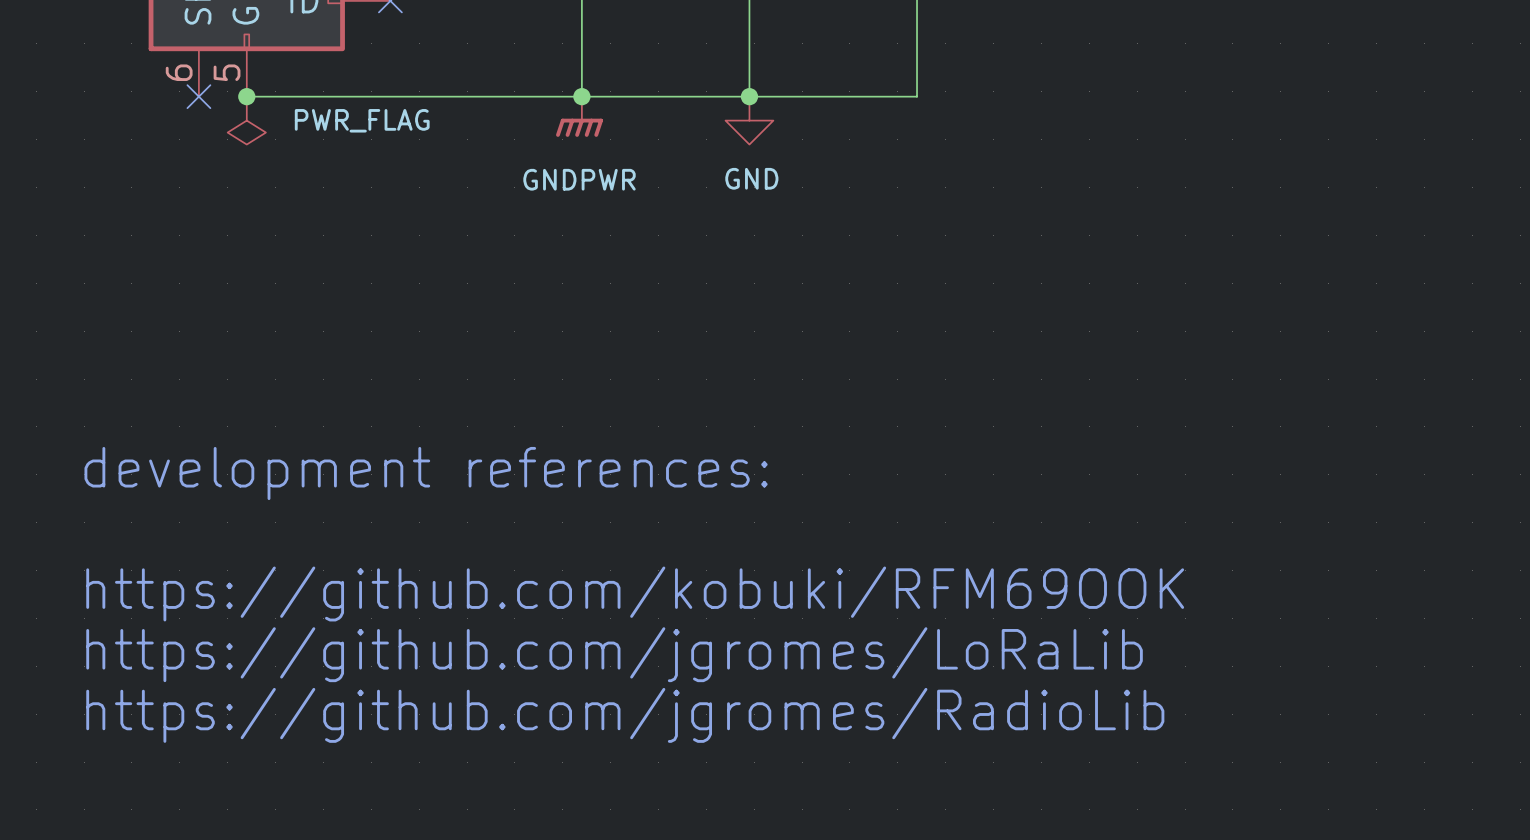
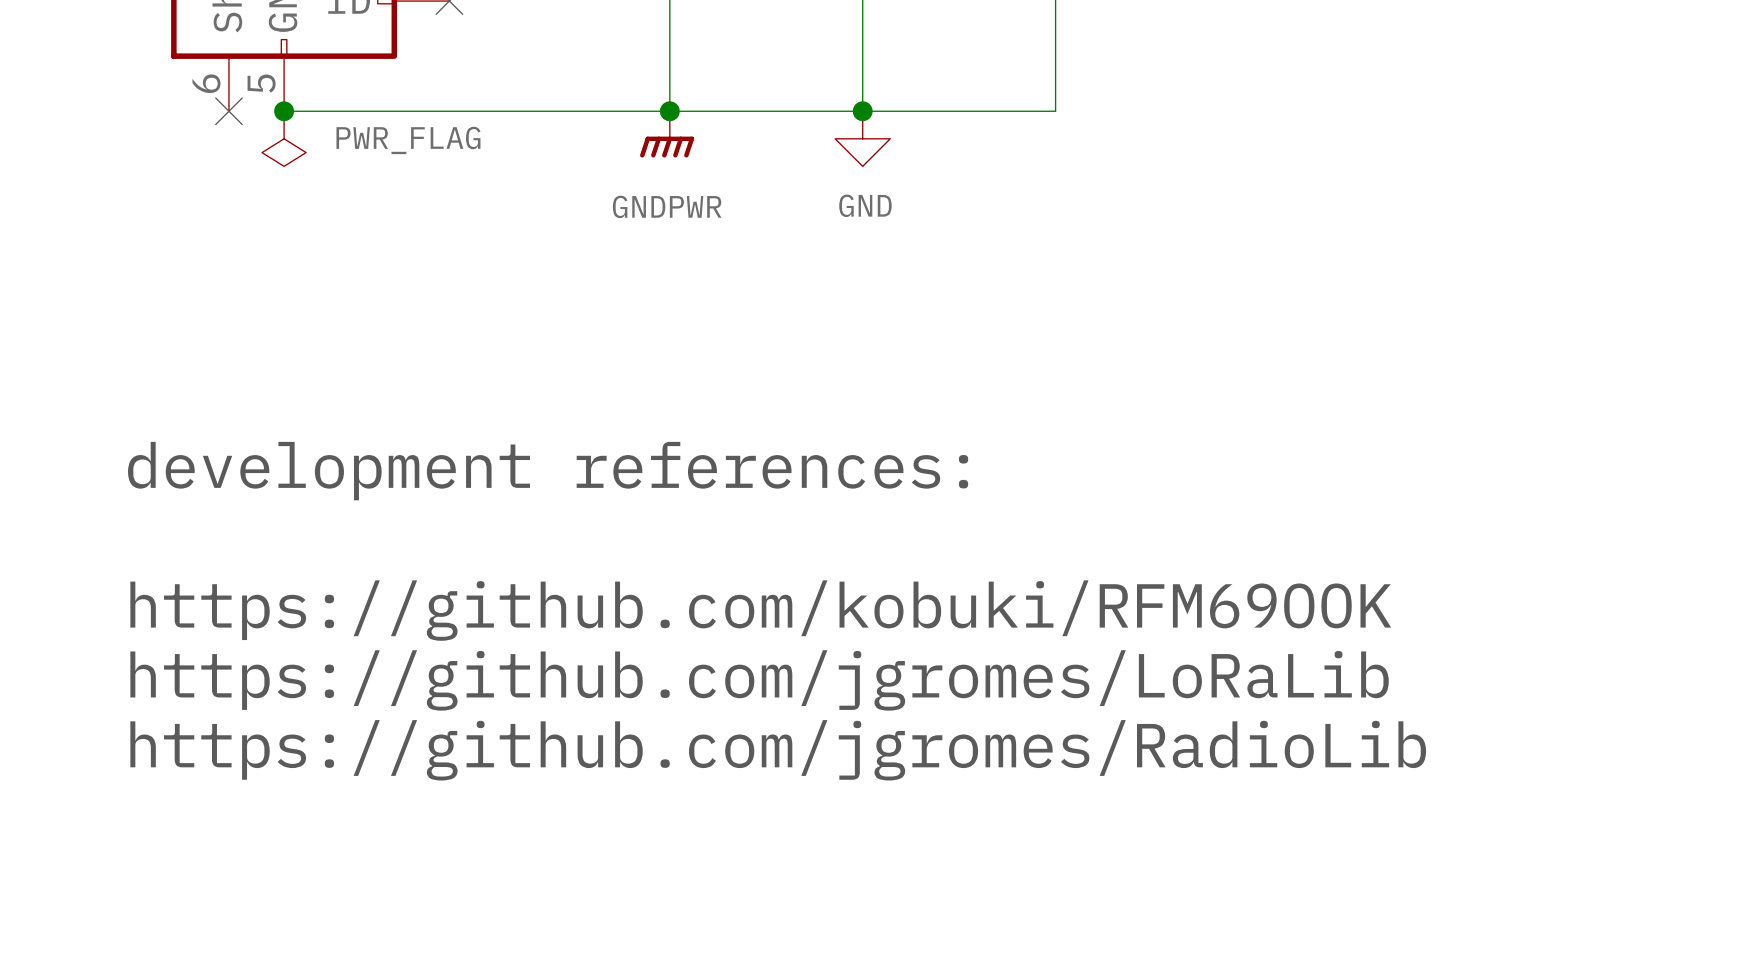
text position: development references: (426, 473) -> development references: (548, 471)
text position: https://github.com/kobuki/RFM69OOK (635, 593) -> https://github.com/kobuki/RFM69OOK (760, 610)
text position: https://github.com/jgromes/LoRaLib (614, 654) -> https://github.com/jgromes/LoRaLib (759, 680)
text position: https://github.com/jgromes/RadioLib (625, 715) -> https://github.com/jgromes/RadioLib (778, 750)

